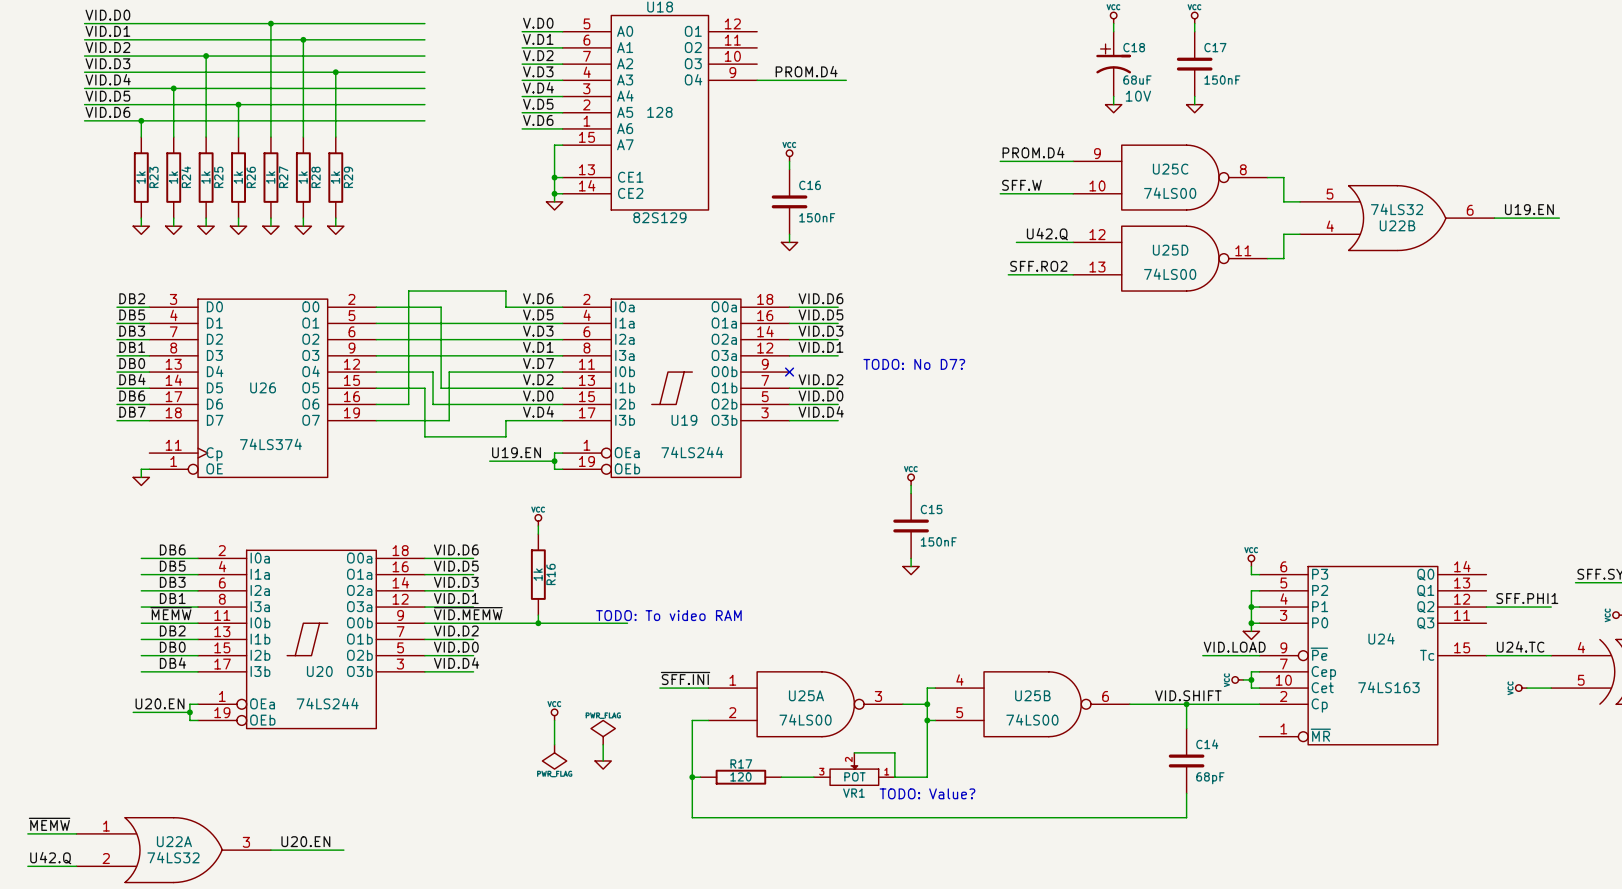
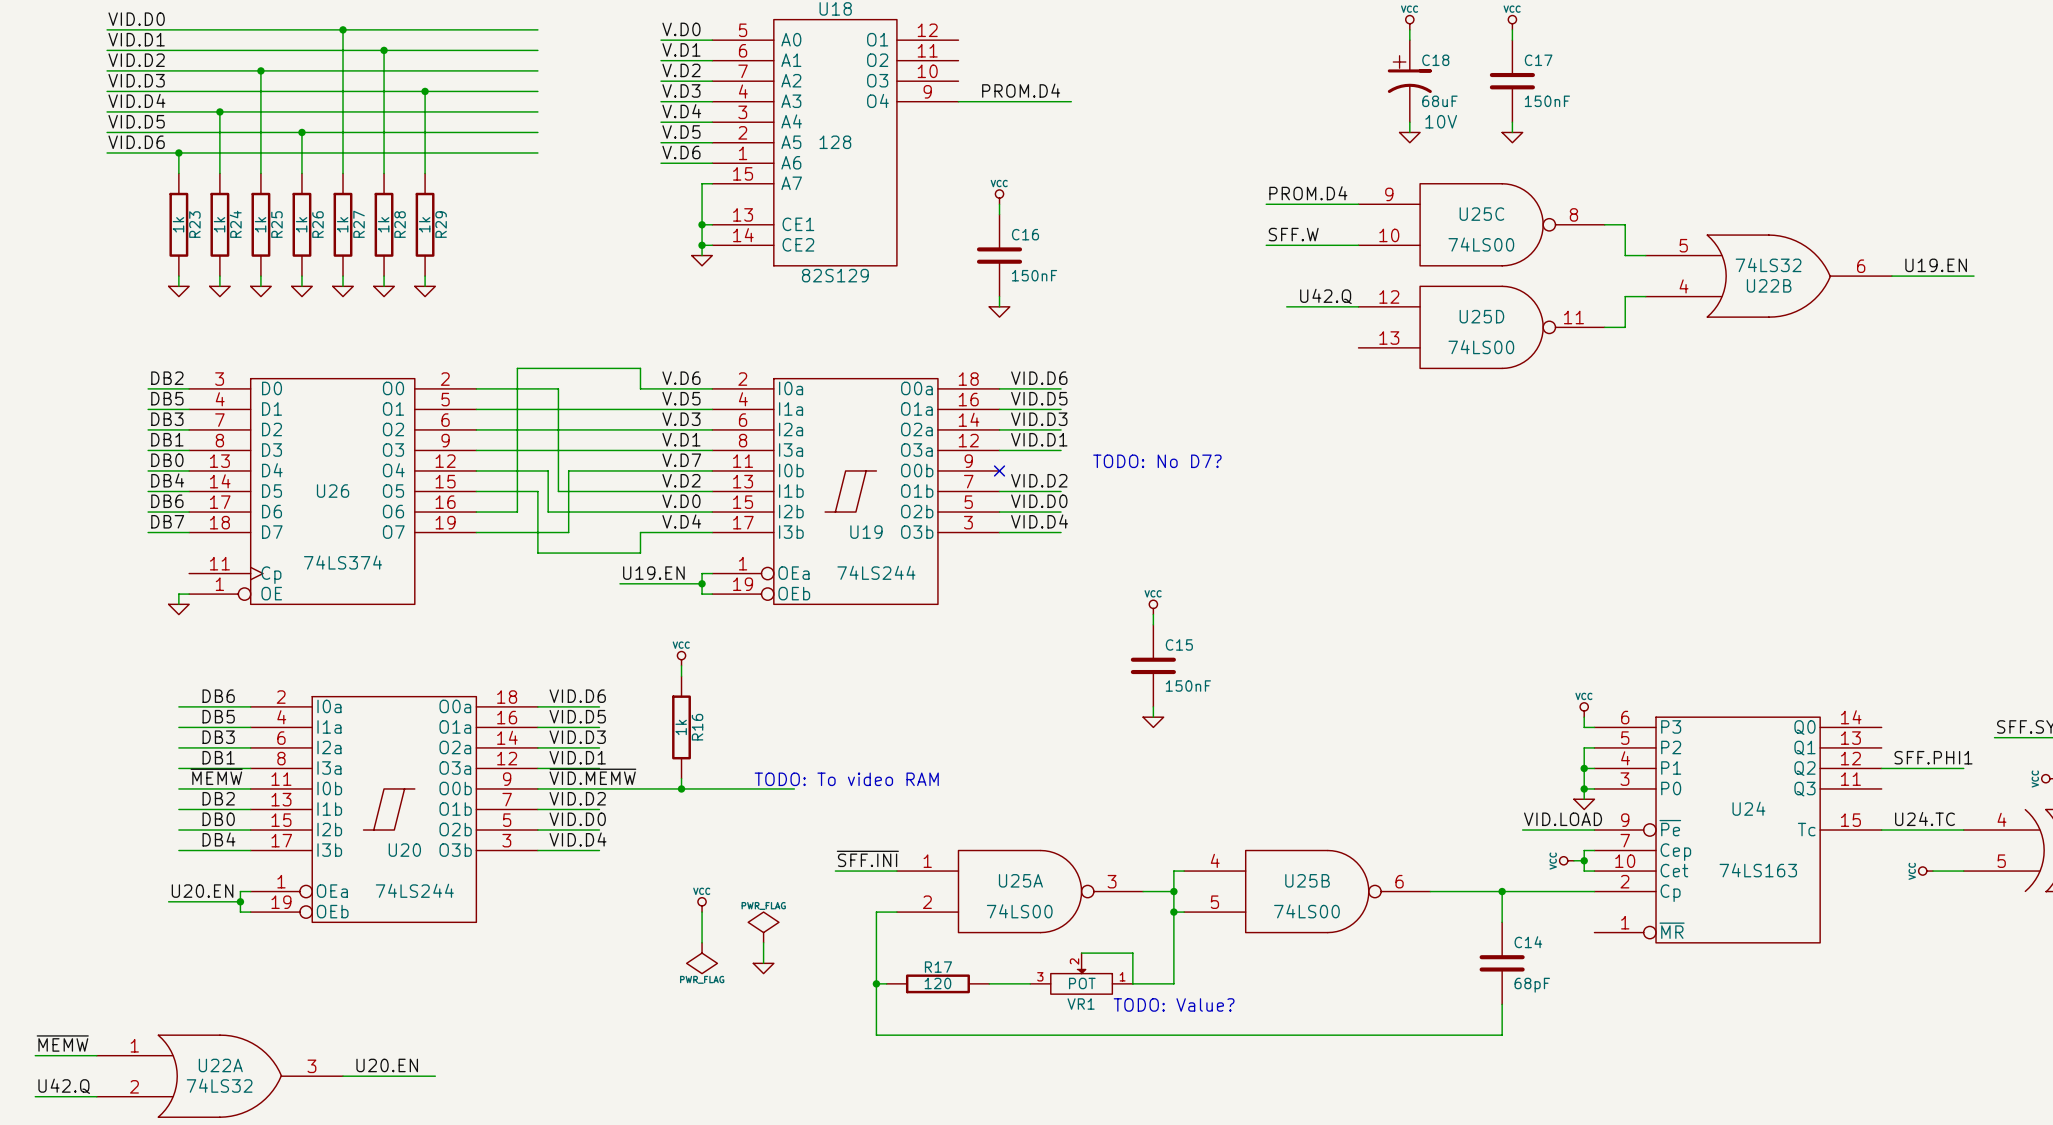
label: SFF.RO2 (1038, 266) -> none
wire: (1008, 274) (1073, 274) -> none
label: VID.SHIFT (1188, 695) -> none

